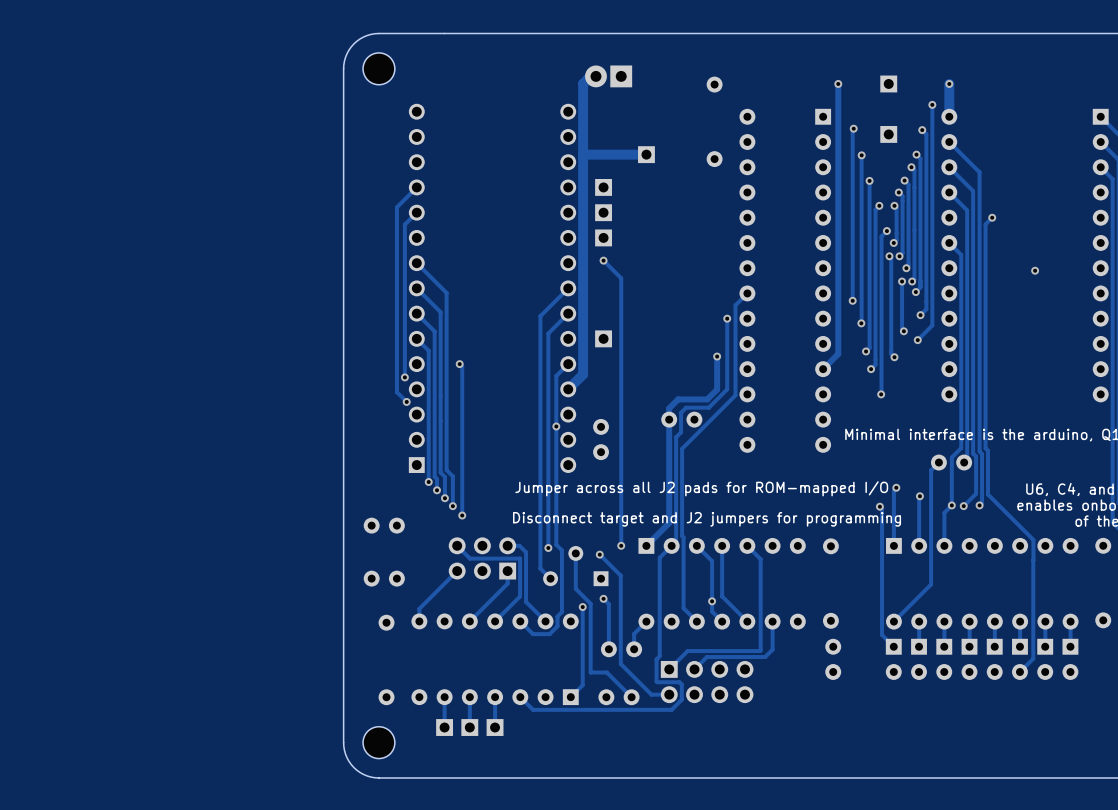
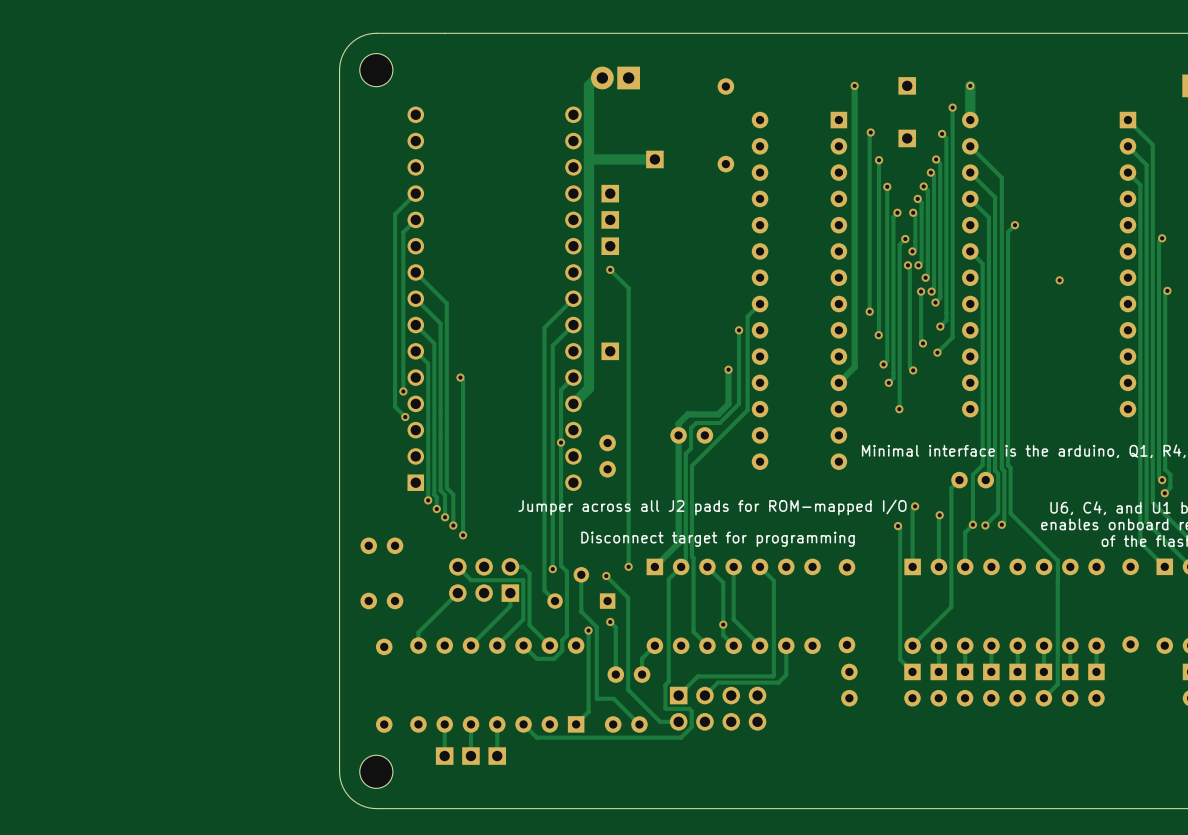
text: Disconnect target and J2 jumpers for programming (707, 519) -> Disconnect target for programming (718, 539)

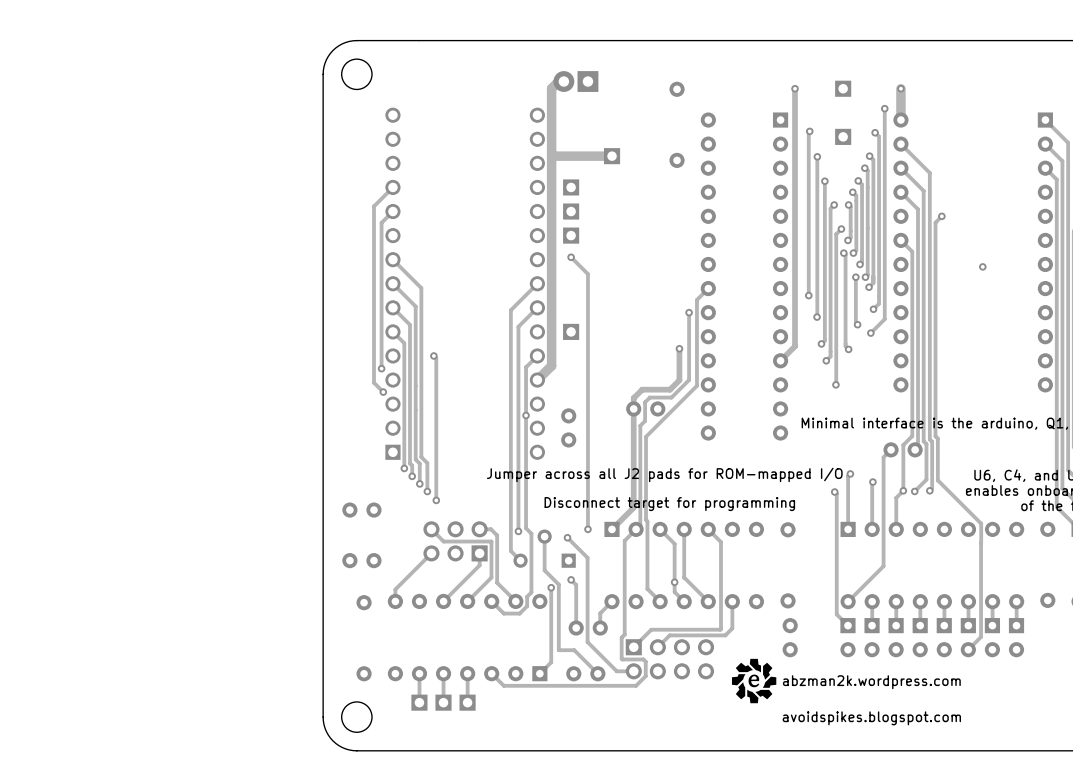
drawing: none -> [731, 658, 777, 704]
text: none -> abzman2k.wordpress.com (871, 682)
text: none -> avoidspikes.blogspot.com (871, 718)

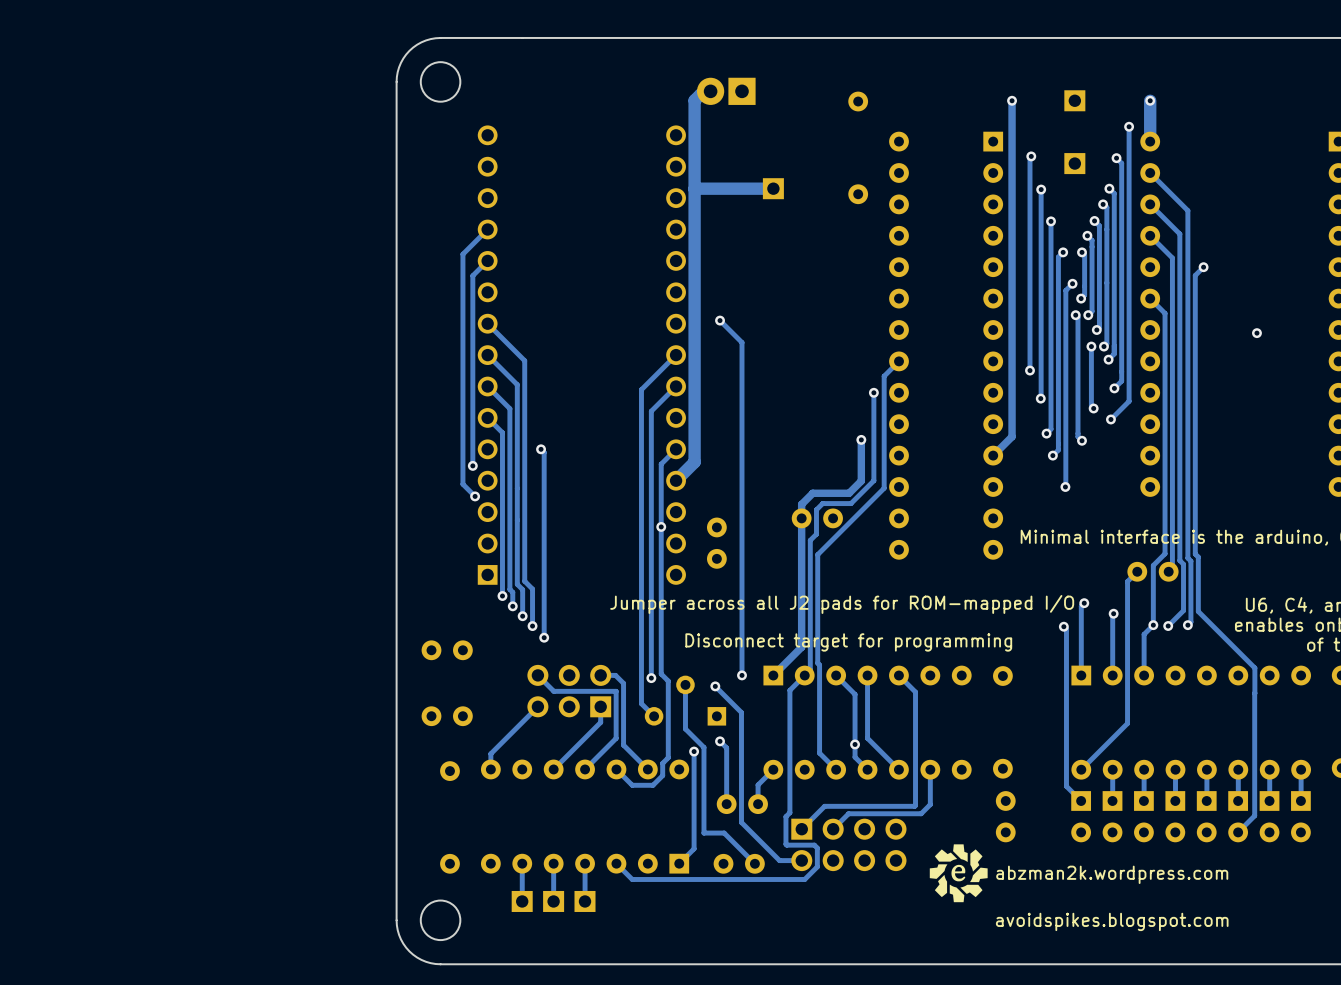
part: (571, 187) -> none
part: (571, 211) -> none
part: (571, 235) -> none
part: (571, 331) -> none

